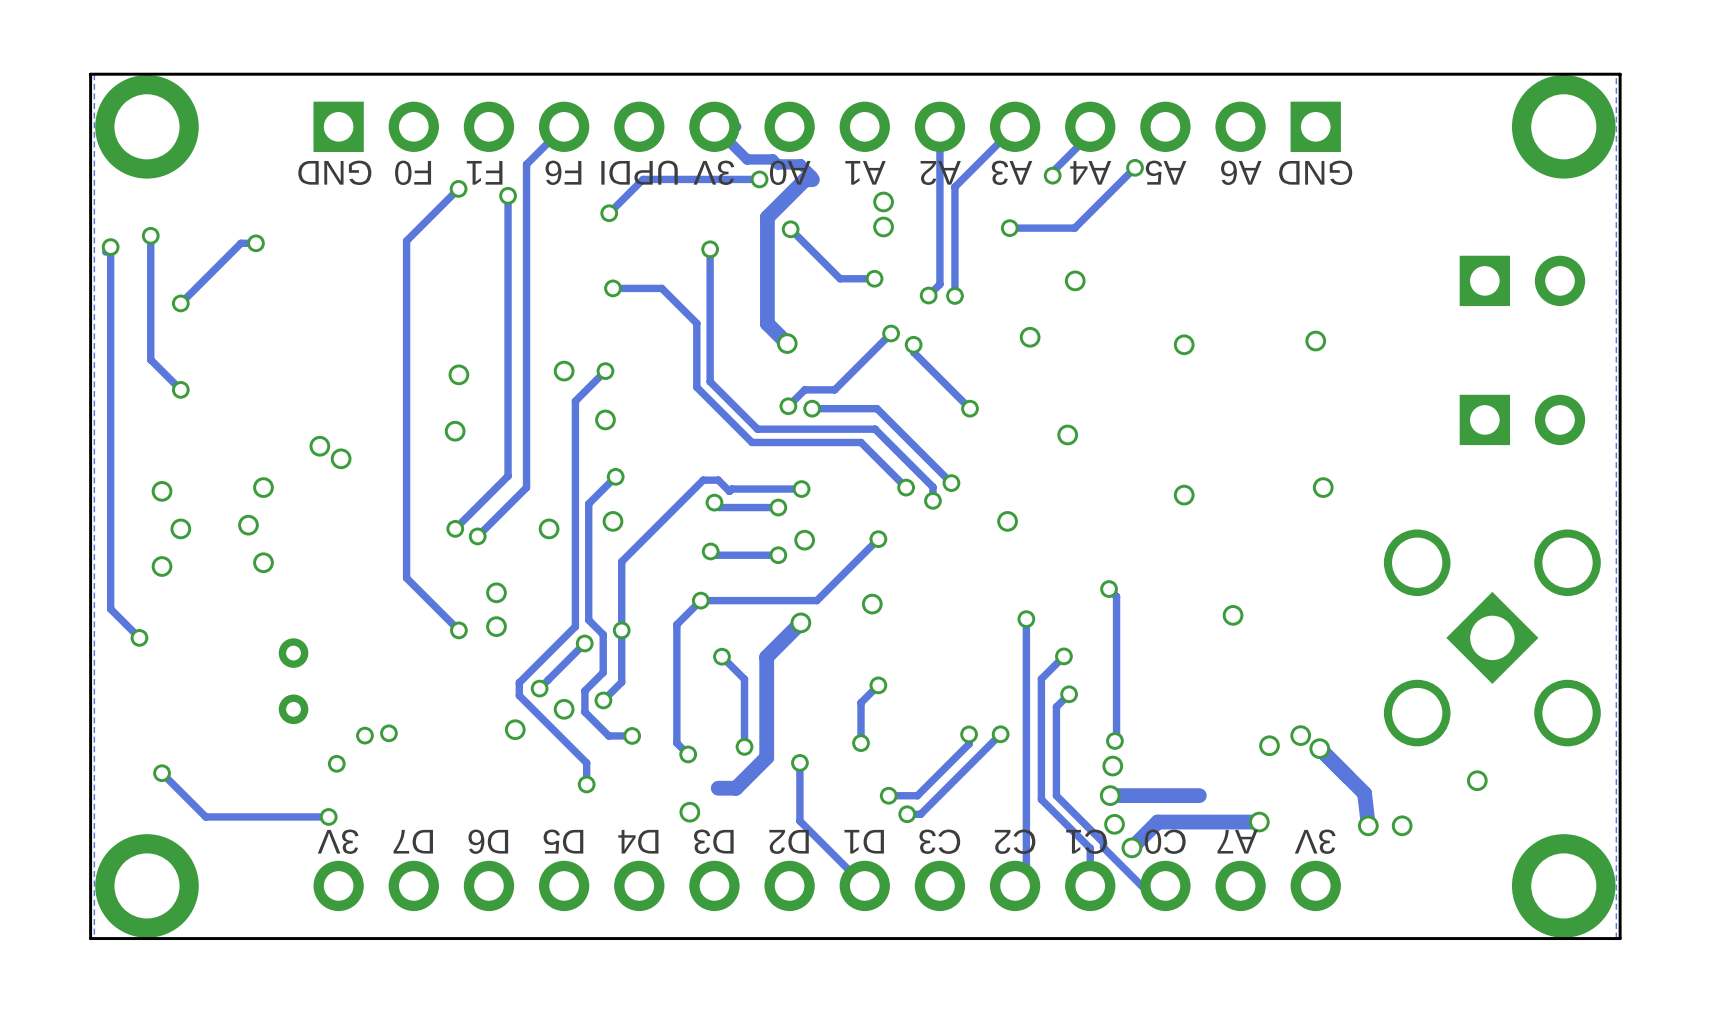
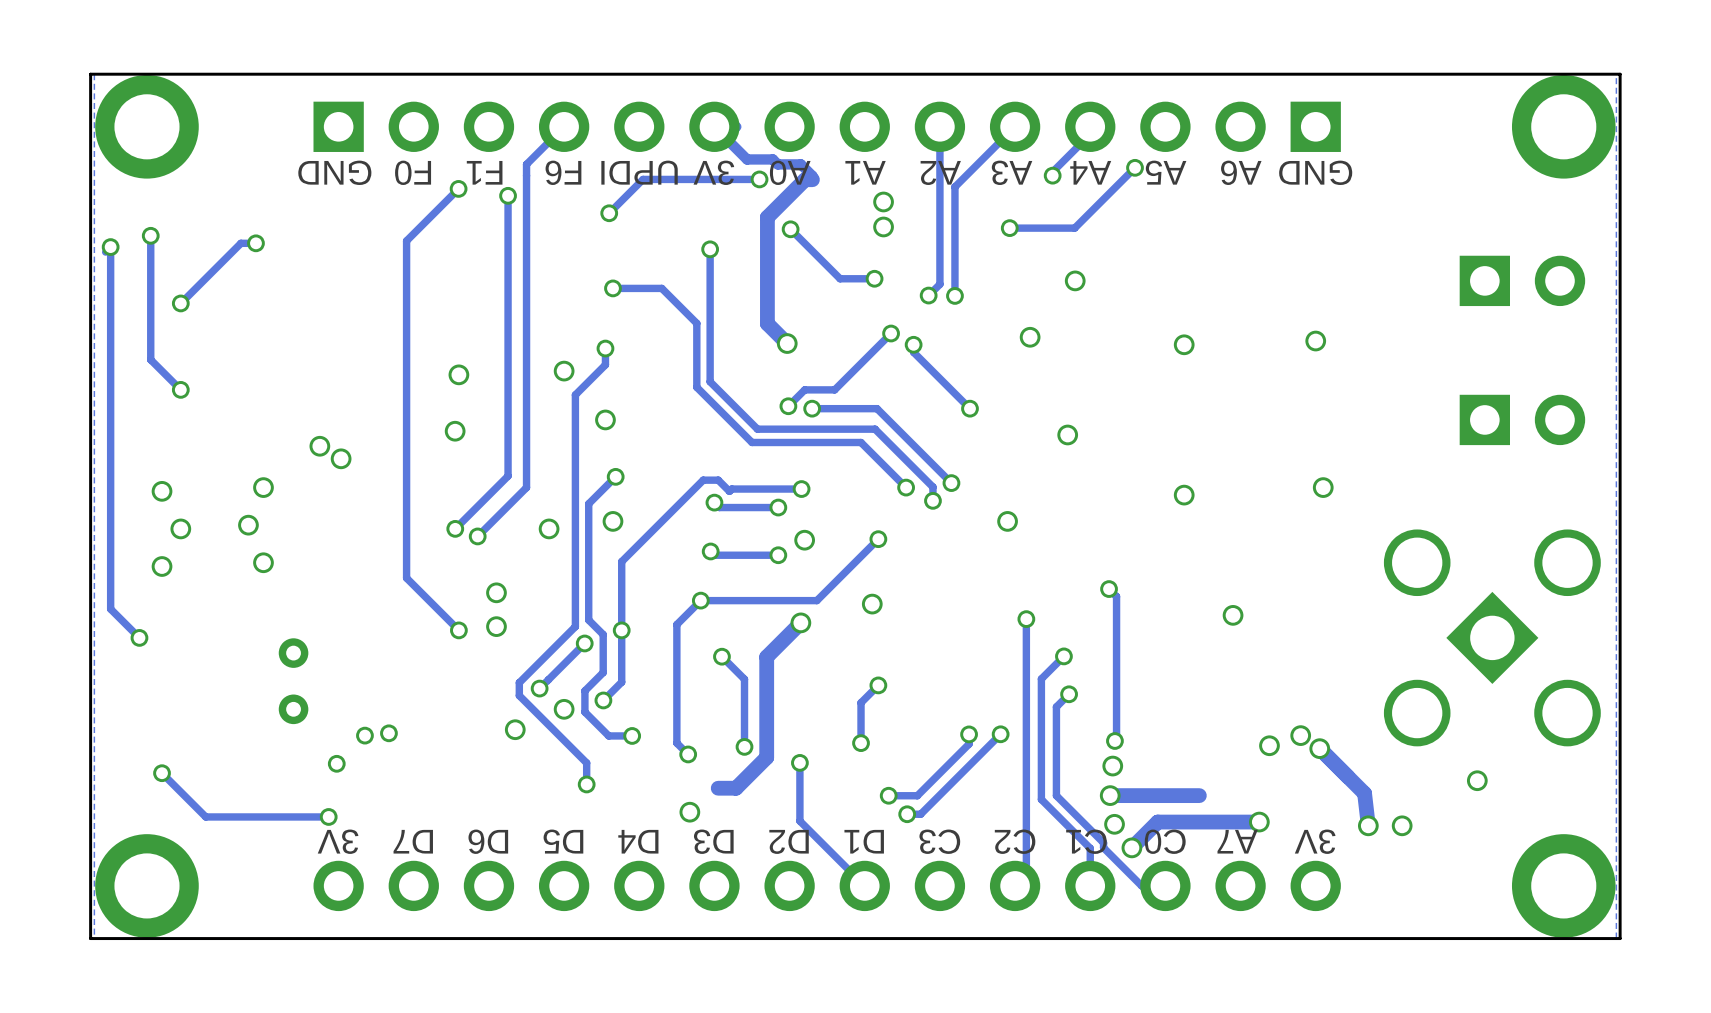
track: (605, 371) (575, 401) -> (605, 352) (605, 364) (575, 394) (575, 401)
via position: (605, 371) -> (605, 348)

